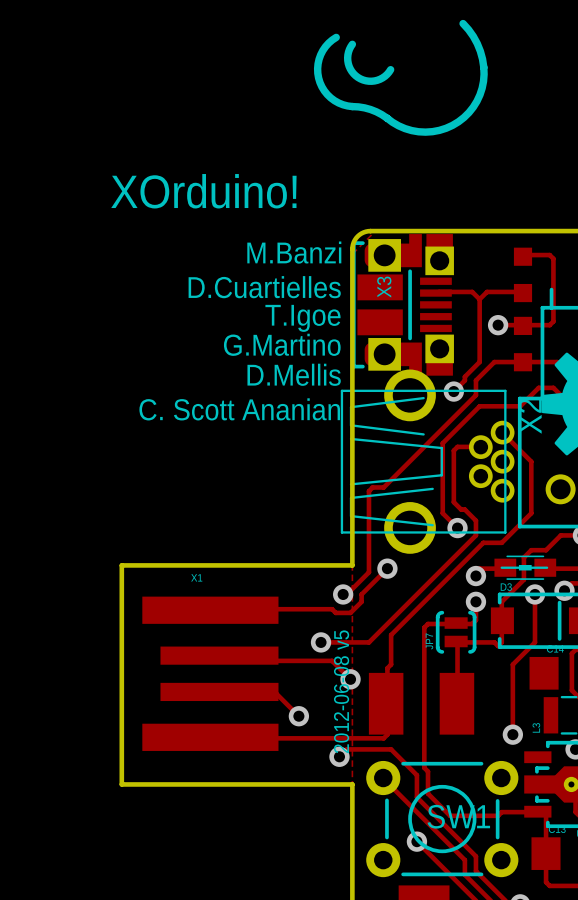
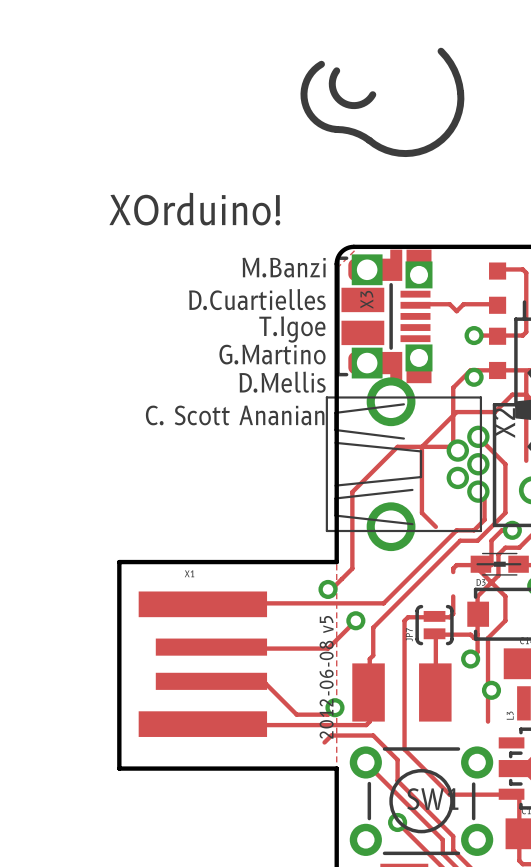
track: (479, 299) (479, 362) (453, 391) -> none
track: none -> (526, 373) (526, 460)
via position: (453, 391) -> (474, 377)
track: (475, 395) (383, 487) (372, 487) -> (453, 401) (453, 446) (397, 446) (355, 488)
track: (479, 446) (457, 446) (453, 450) (453, 502) (475, 520) (475, 535) -> (478, 491) (484, 495) (484, 519) (474, 530) (456, 530) (453, 533)
via: (457, 528) -> none
via: none -> (512, 530)
track: (387, 568) (361, 594) (361, 601) (350, 612) (335, 612) (332, 609) -> none
via: (387, 568) -> none
via: (475, 576) -> none
track: (534, 594) (534, 642) (512, 664) -> (512, 530) (501, 530) (491, 540) (491, 565) (481, 565) (477, 561) (474, 565) (505, 596) (505, 620) (488, 638) (488, 655)
via: (534, 594) -> none
via: (475, 601) -> none
track: (402, 609) (368, 642) (321, 642) -> (383, 603) (317, 603)
via: none -> (355, 620)
via: (321, 642) -> none
track: none -> (477, 634) (477, 652) (470, 659)
track: (254, 657) (258, 660) (332, 660) (350, 679) -> (244, 648) (328, 648) (355, 620)
via: none -> (470, 659)
via: (350, 679) -> none
track: none -> (286, 704) (296, 714) (328, 714) (334, 707)
via: (298, 716) -> none
via: none -> (334, 707)
via position: (512, 734) -> (491, 690)
via: (339, 756) -> none
track: (424, 764) (424, 767) (428, 771) (428, 793) (450, 815) (498, 815) (501, 812) -> (404, 749) (449, 794) (477, 794)

